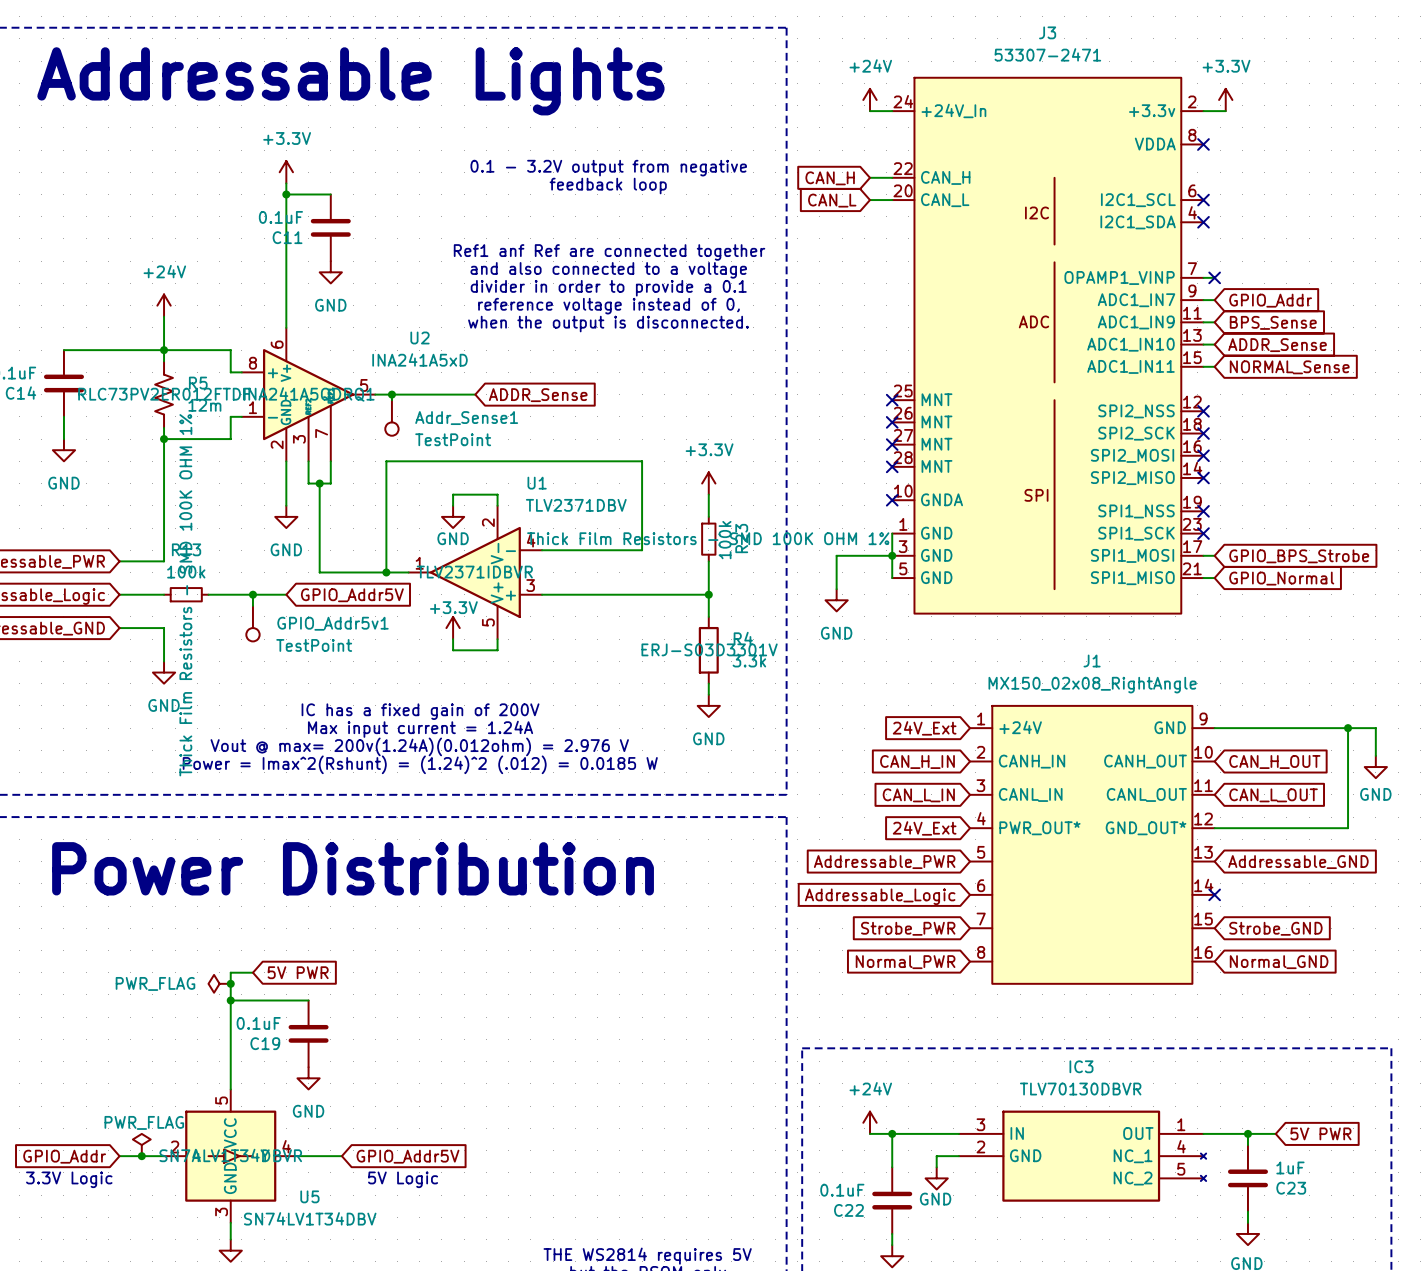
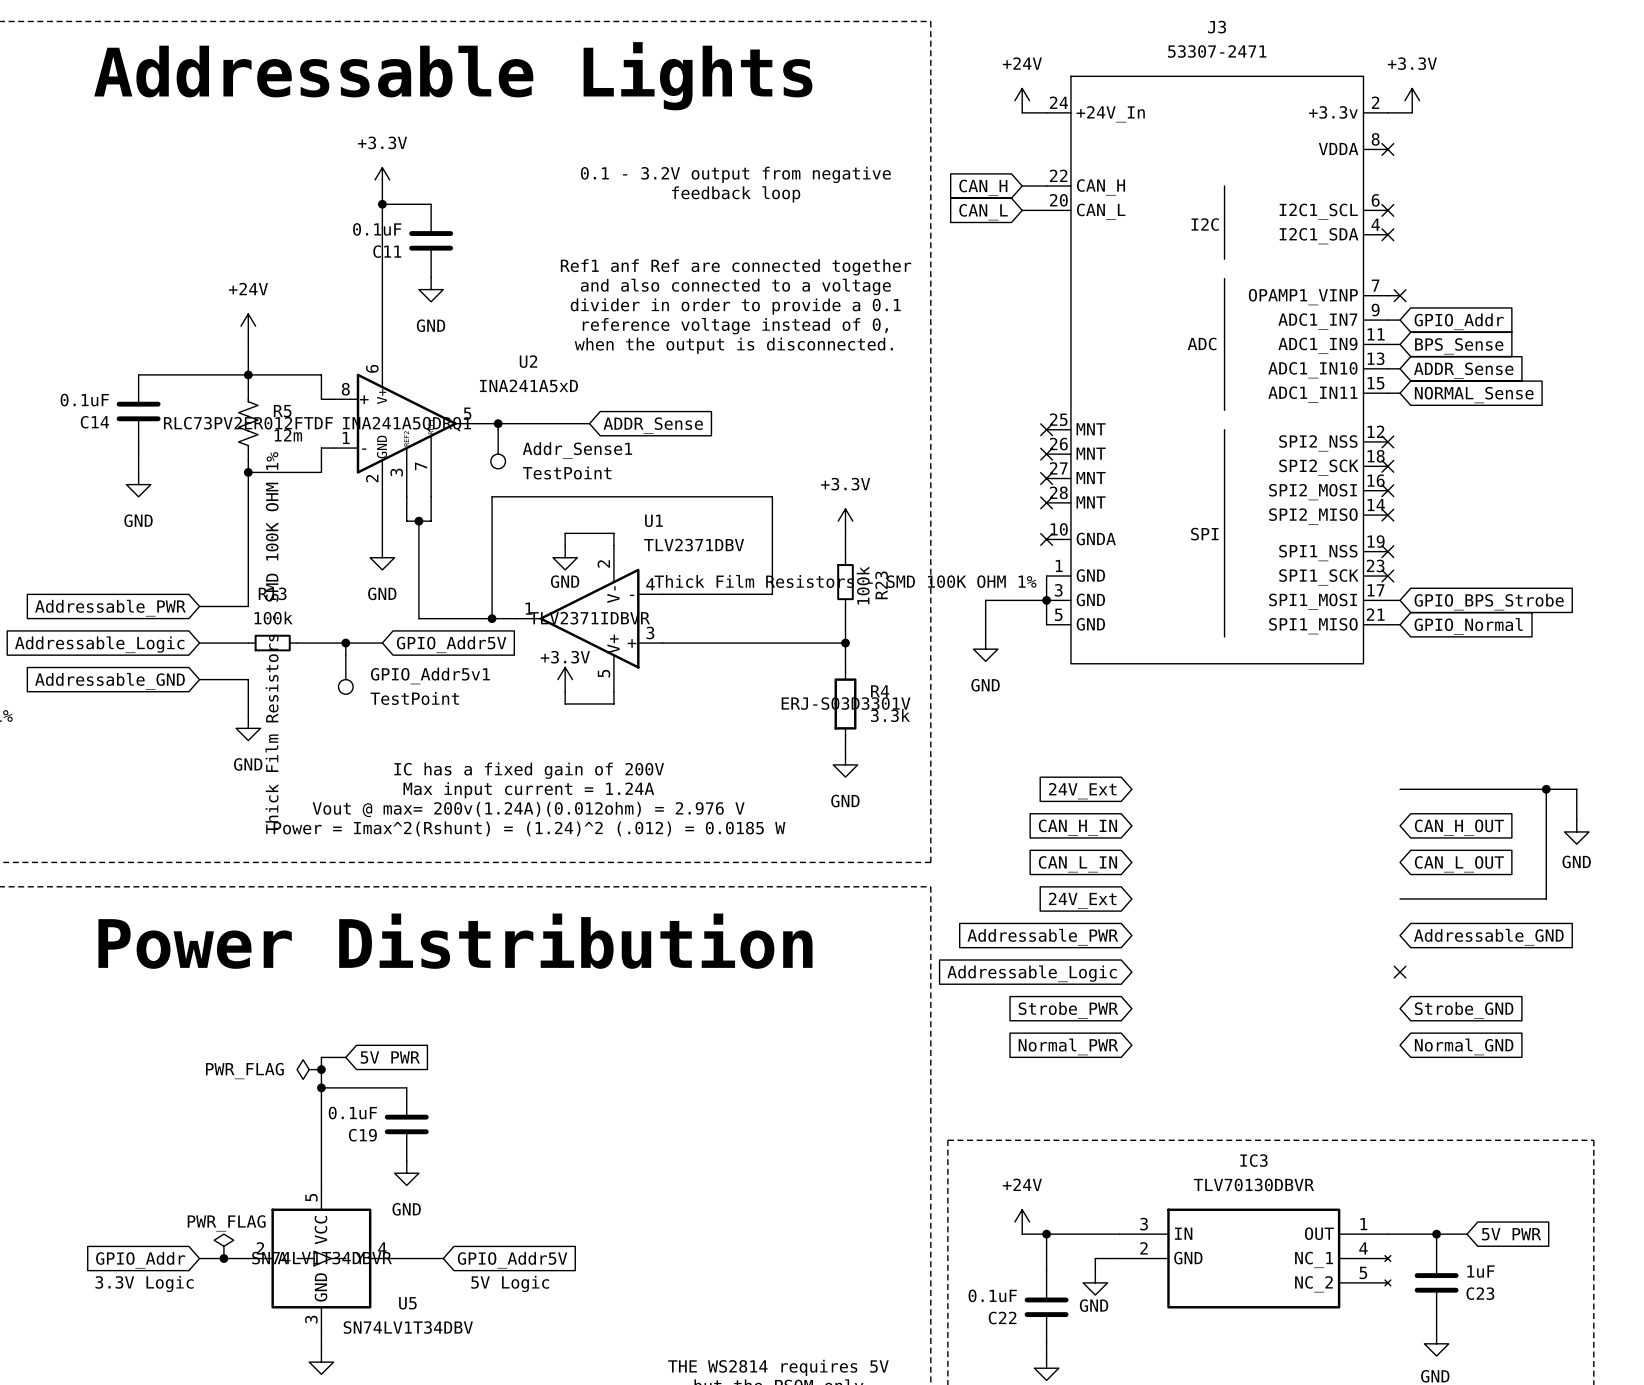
J1: MX150_02x08_RightAngle (1092, 844) -> none

